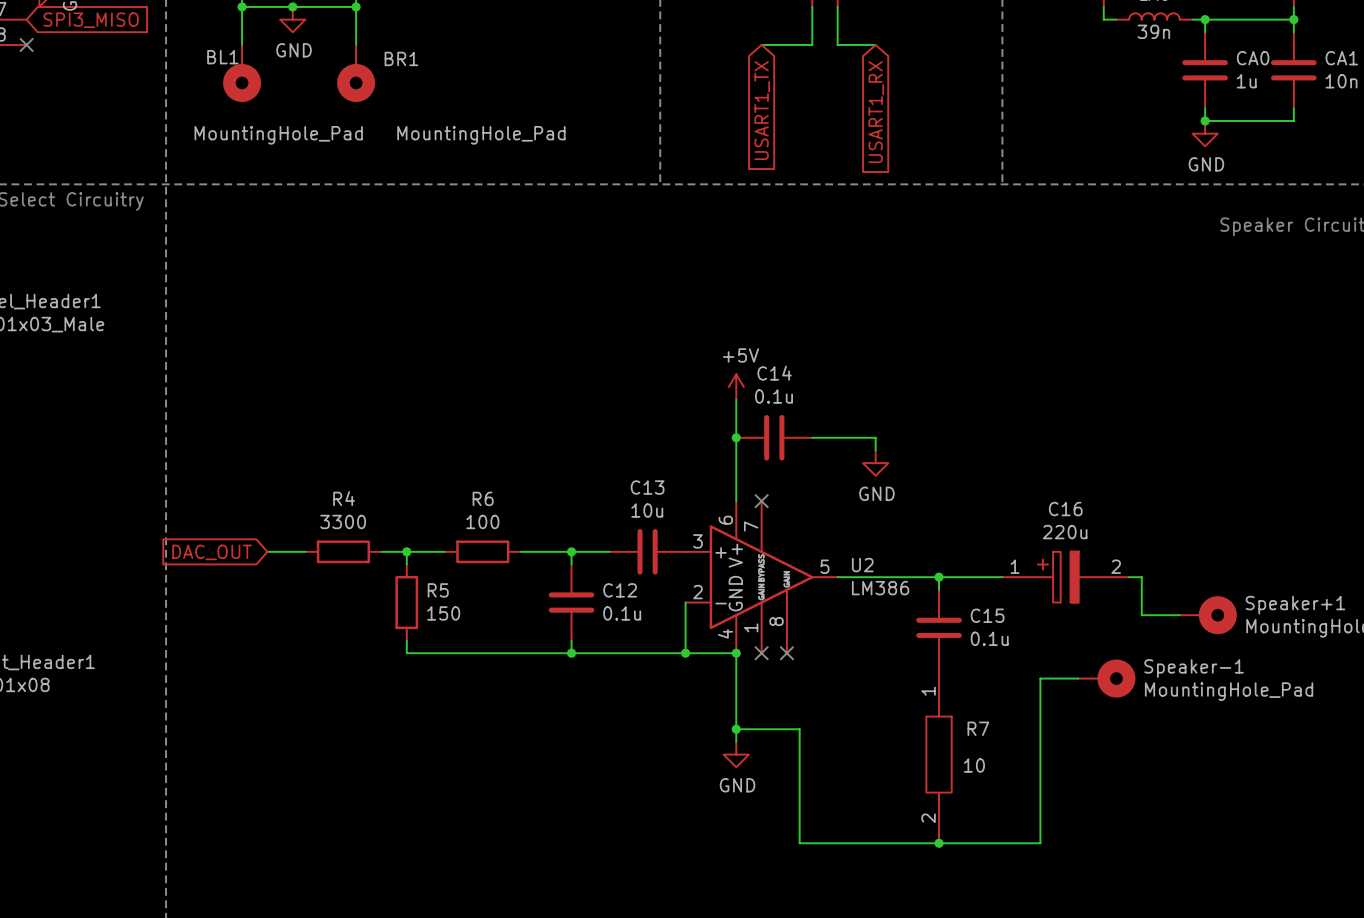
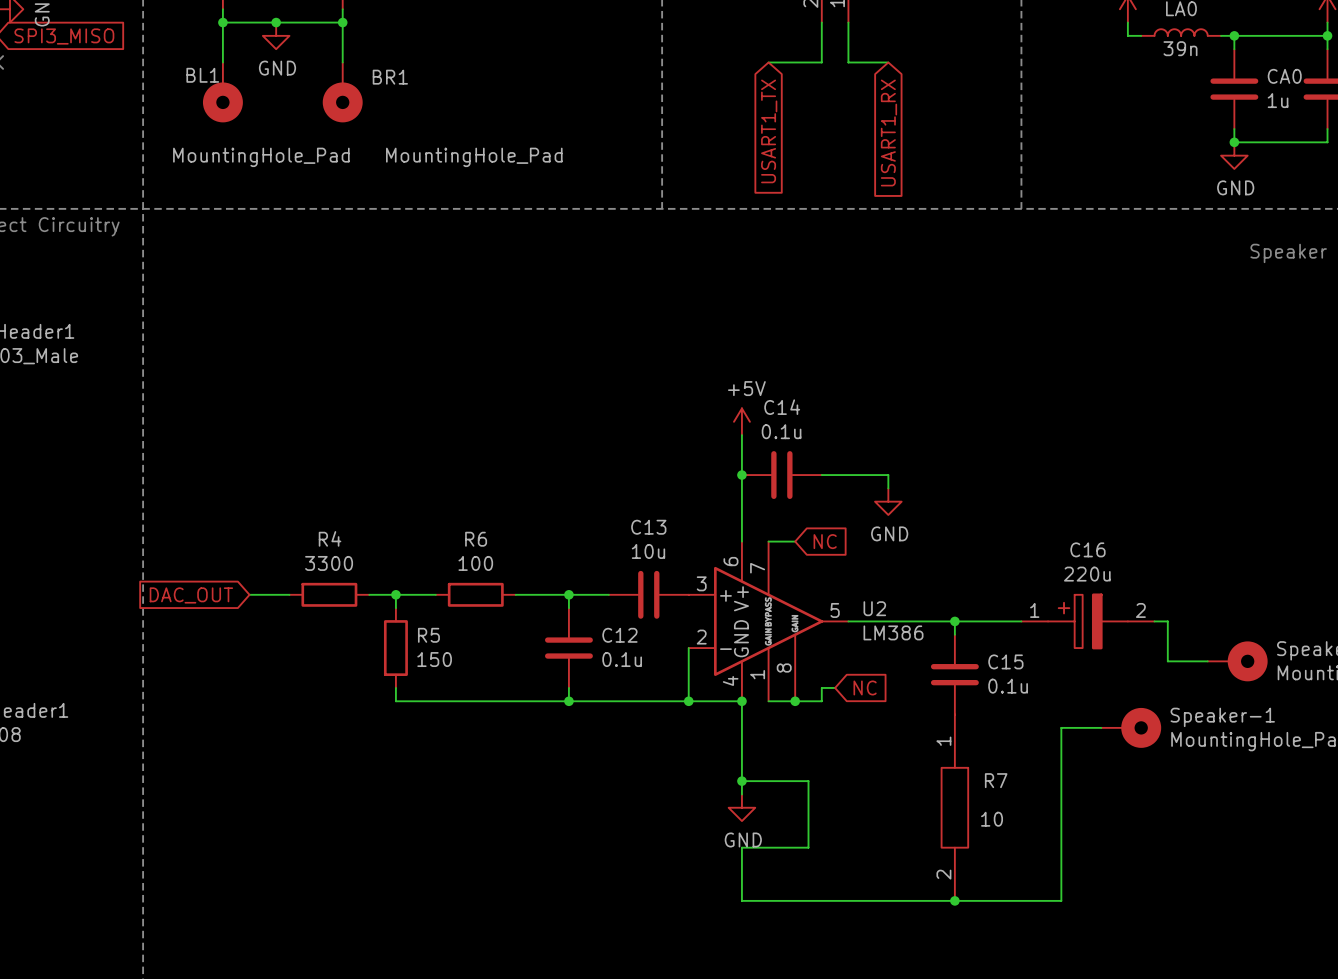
wire: none -> (768, 541) (795, 541)
no-connect mark: (761, 501) -> none
global label: none -> NC (825, 541)
wire: none -> (835, 687) (821, 687) (821, 701) (768, 701)
global label: none -> NC (865, 687)
no-connect mark: (761, 653) -> none
no-connect mark: (786, 653) -> none
junction: none -> (795, 701)
wire: (799, 792) (799, 843) -> (808, 847) (741, 847) (741, 900) (808, 900)

